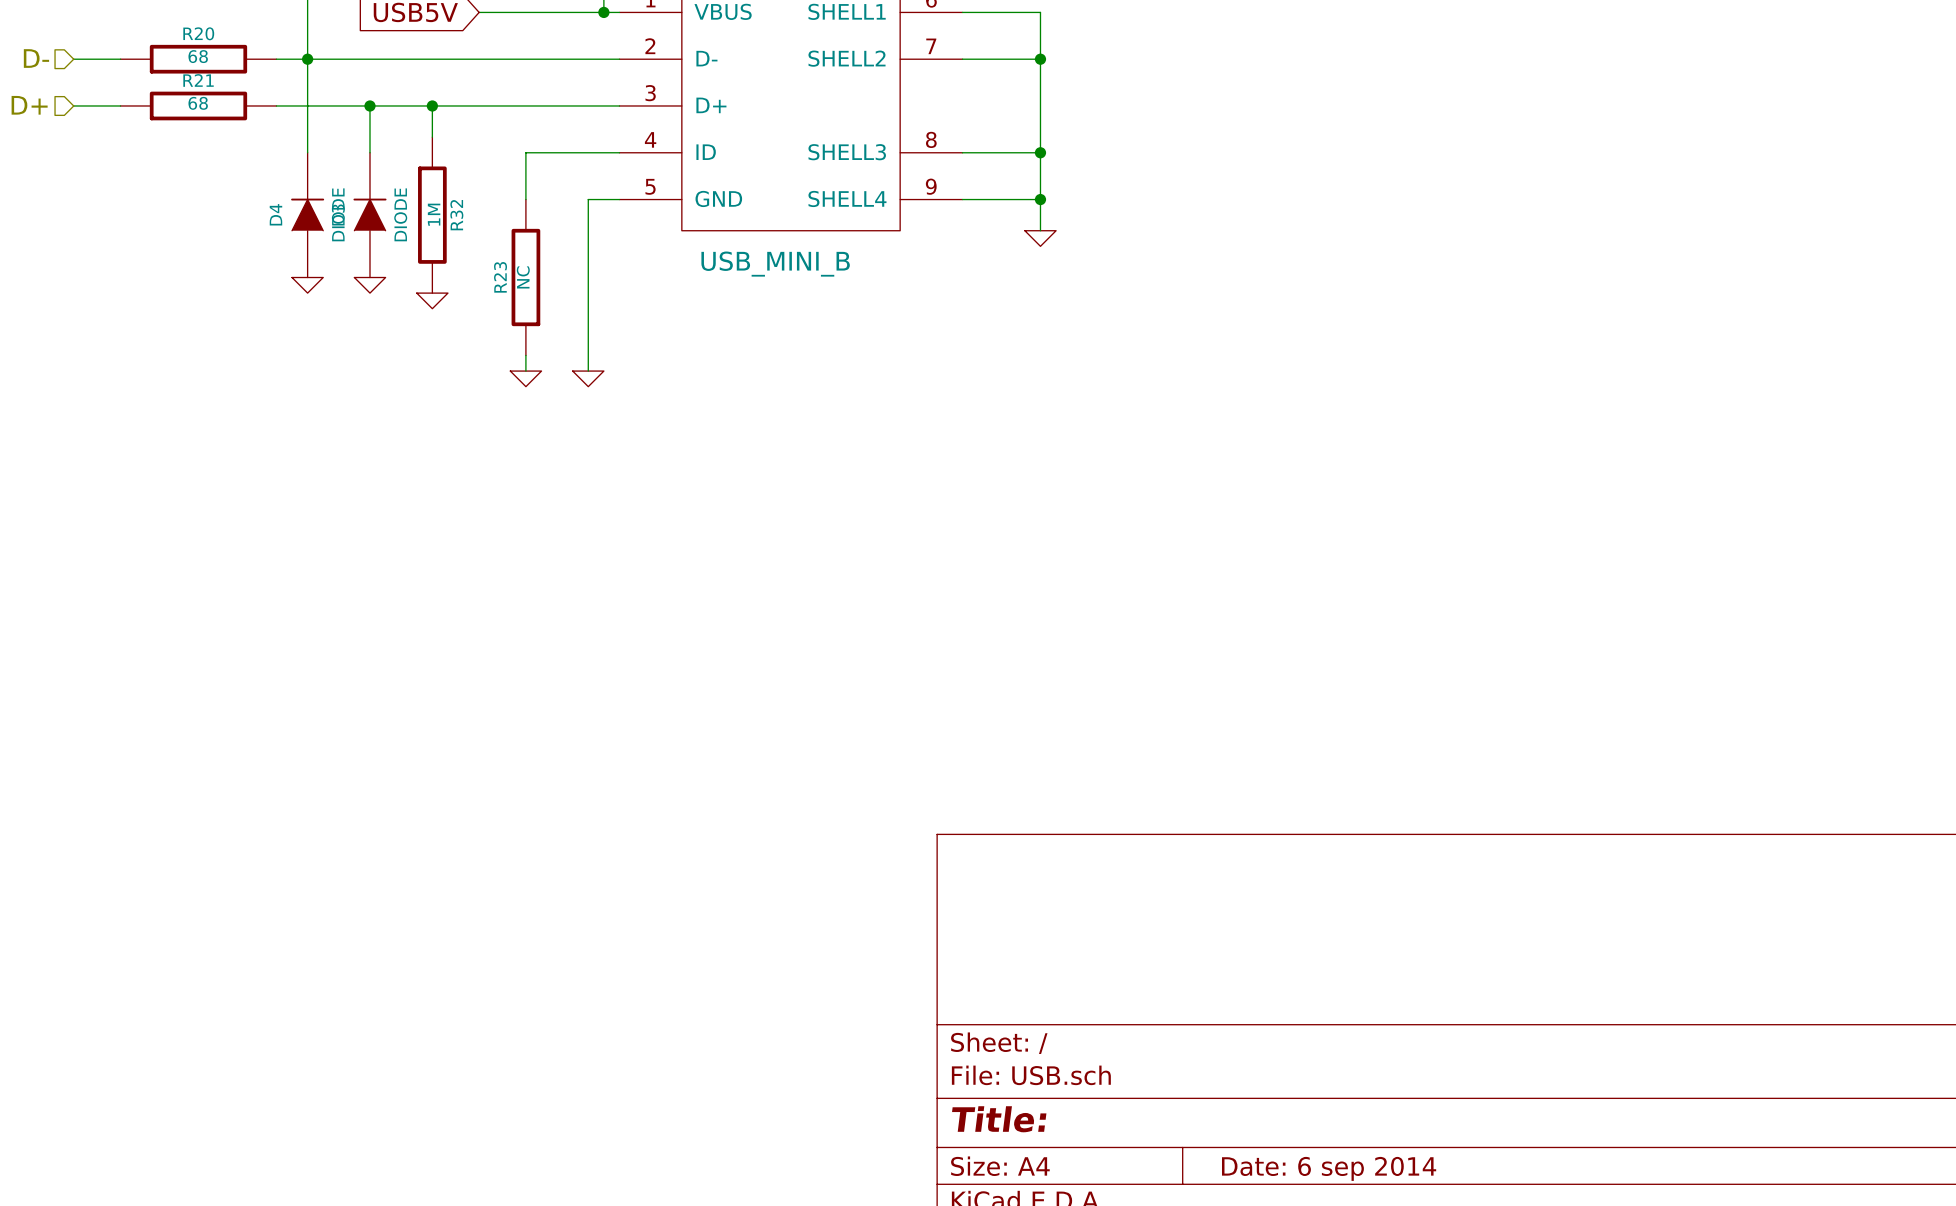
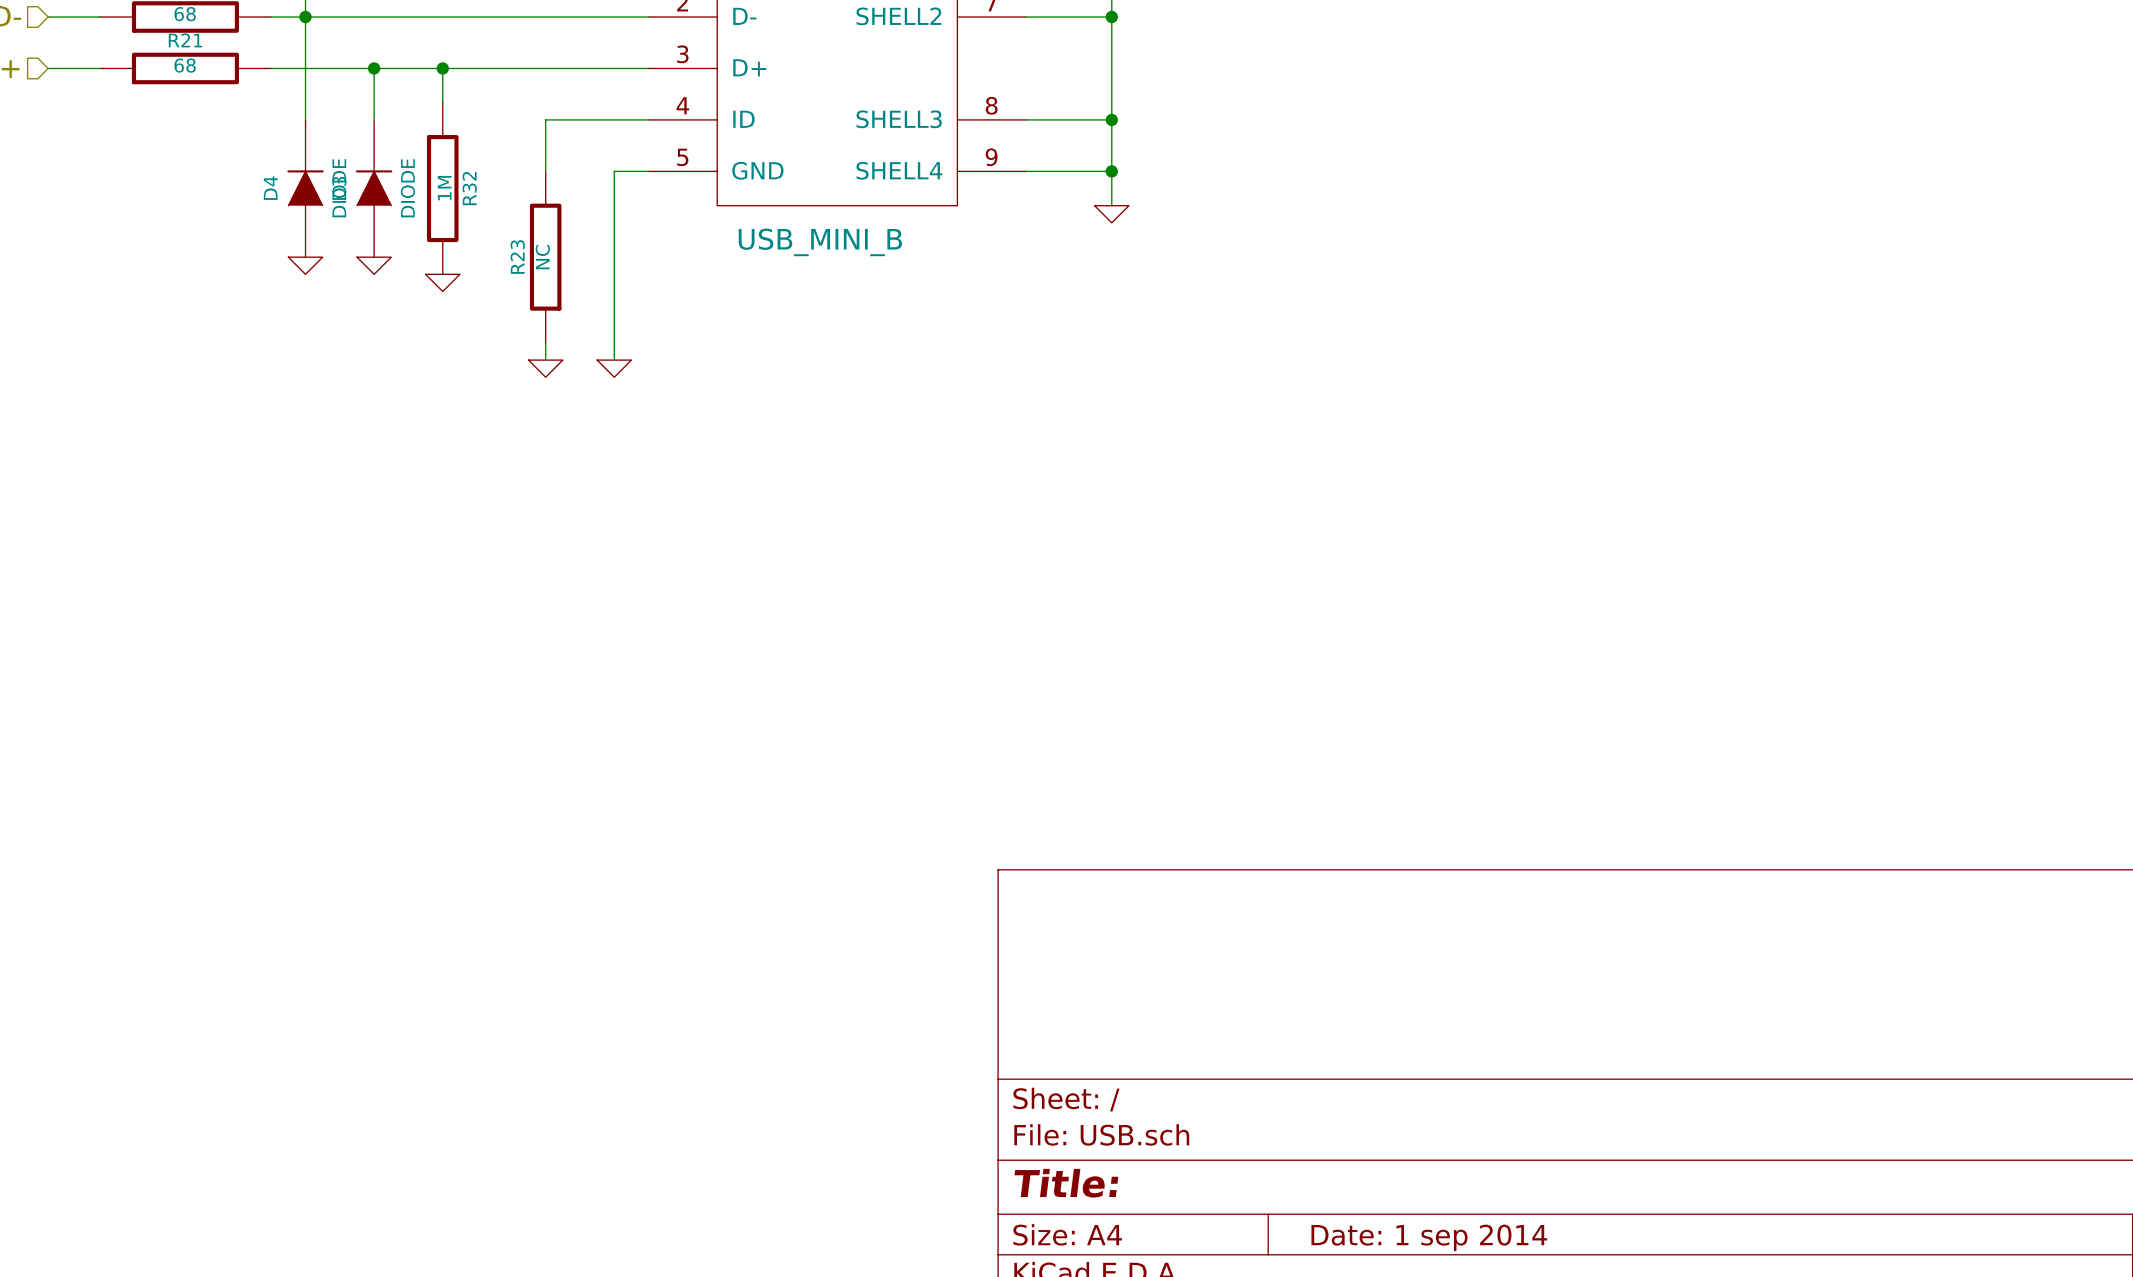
title block: Date: 6 sep 2014 (1329, 1168) -> Date: 1 sep 2014 (1429, 1237)

